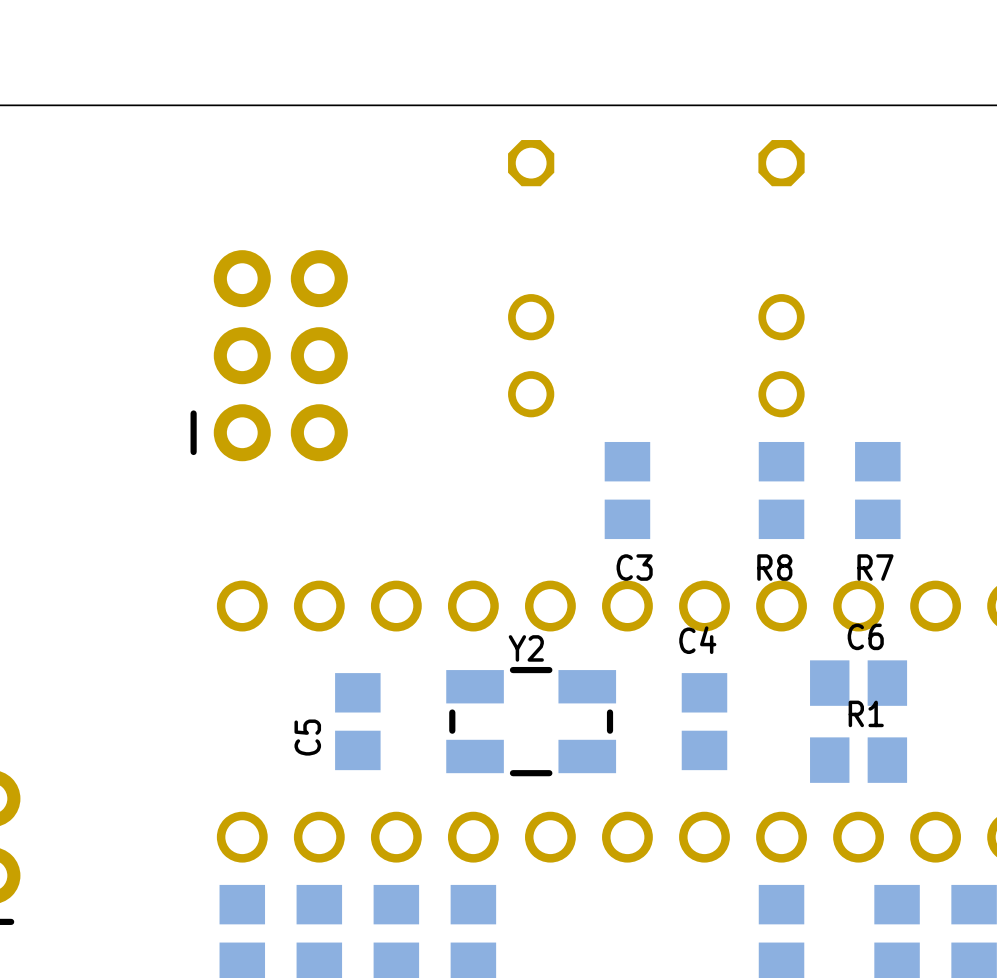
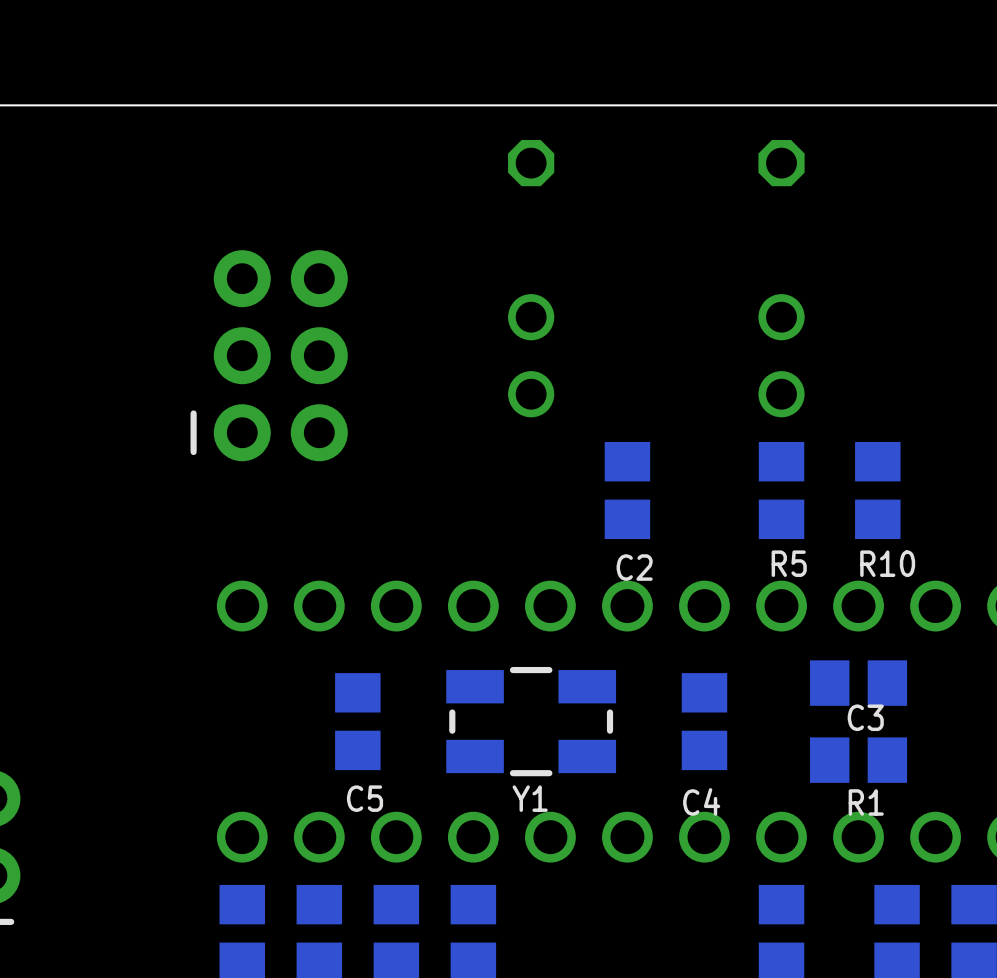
C3 name: C3 (634, 567) -> C2 (634, 567)
R8 name: R8 (774, 567) -> R5 (789, 563)
R7 name: R7 (875, 567) -> R10 (887, 563)
C6 name: C6 (865, 636) -> C3 (865, 717)
C4 name position: C4 (697, 640) -> C4 (701, 801)
Y2 name: Y2 (526, 648) -> Y1 (530, 798)
R1 name position: R1 (866, 713) -> R1 (866, 802)
C5 name rotation: 0° (307, 737) -> 90° clockwise (365, 798)
C5 name position: C5 (307, 737) -> C5 (365, 798)

